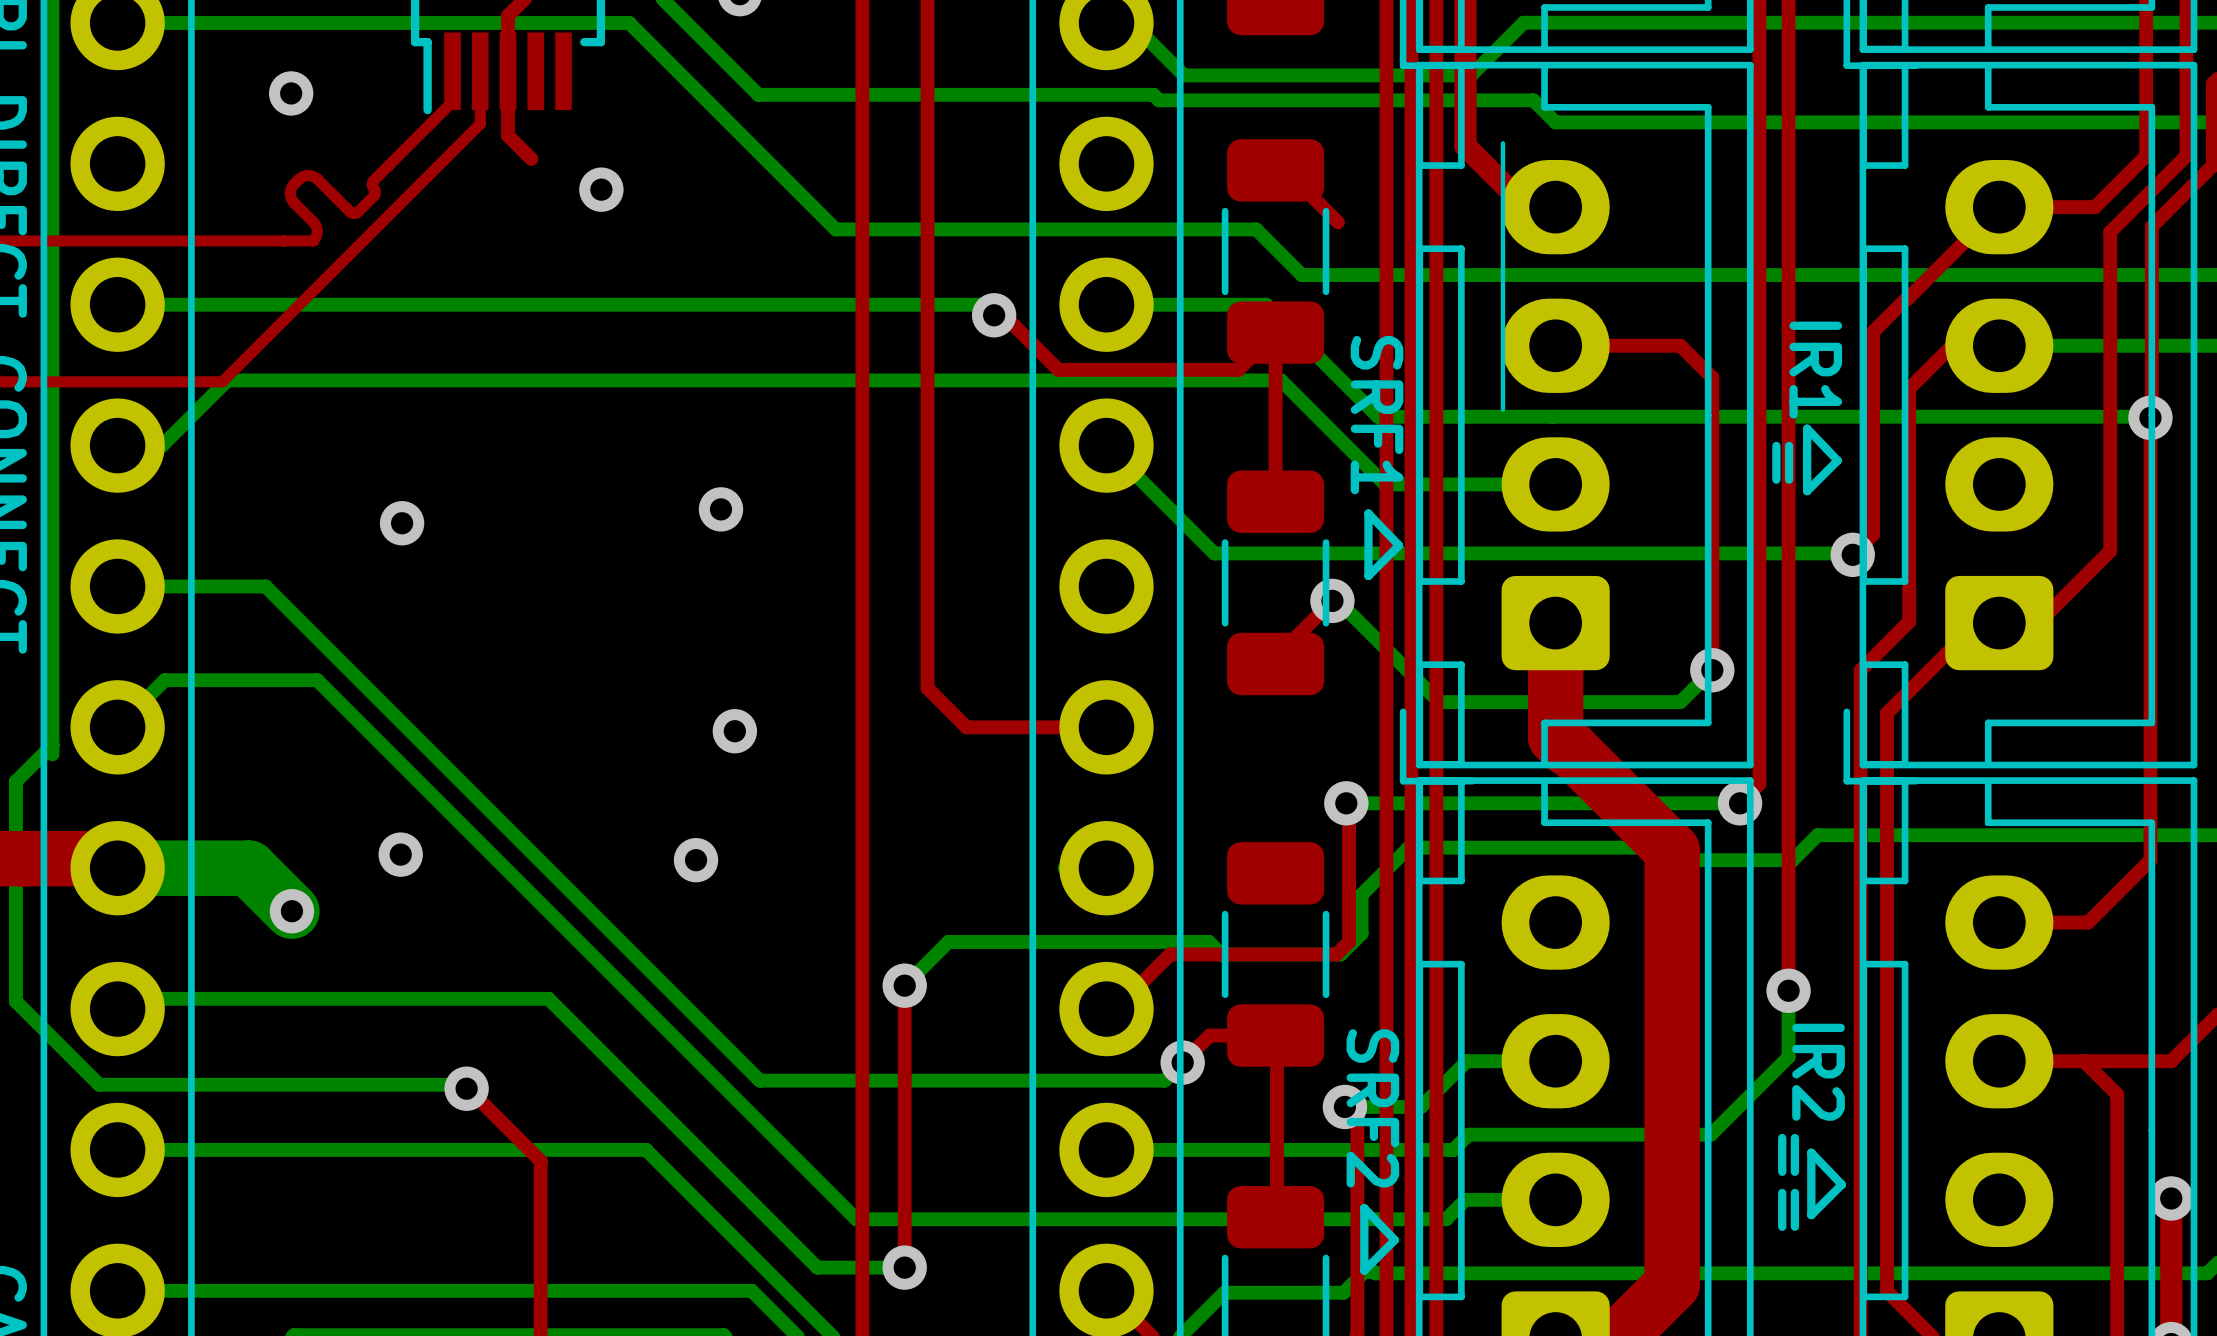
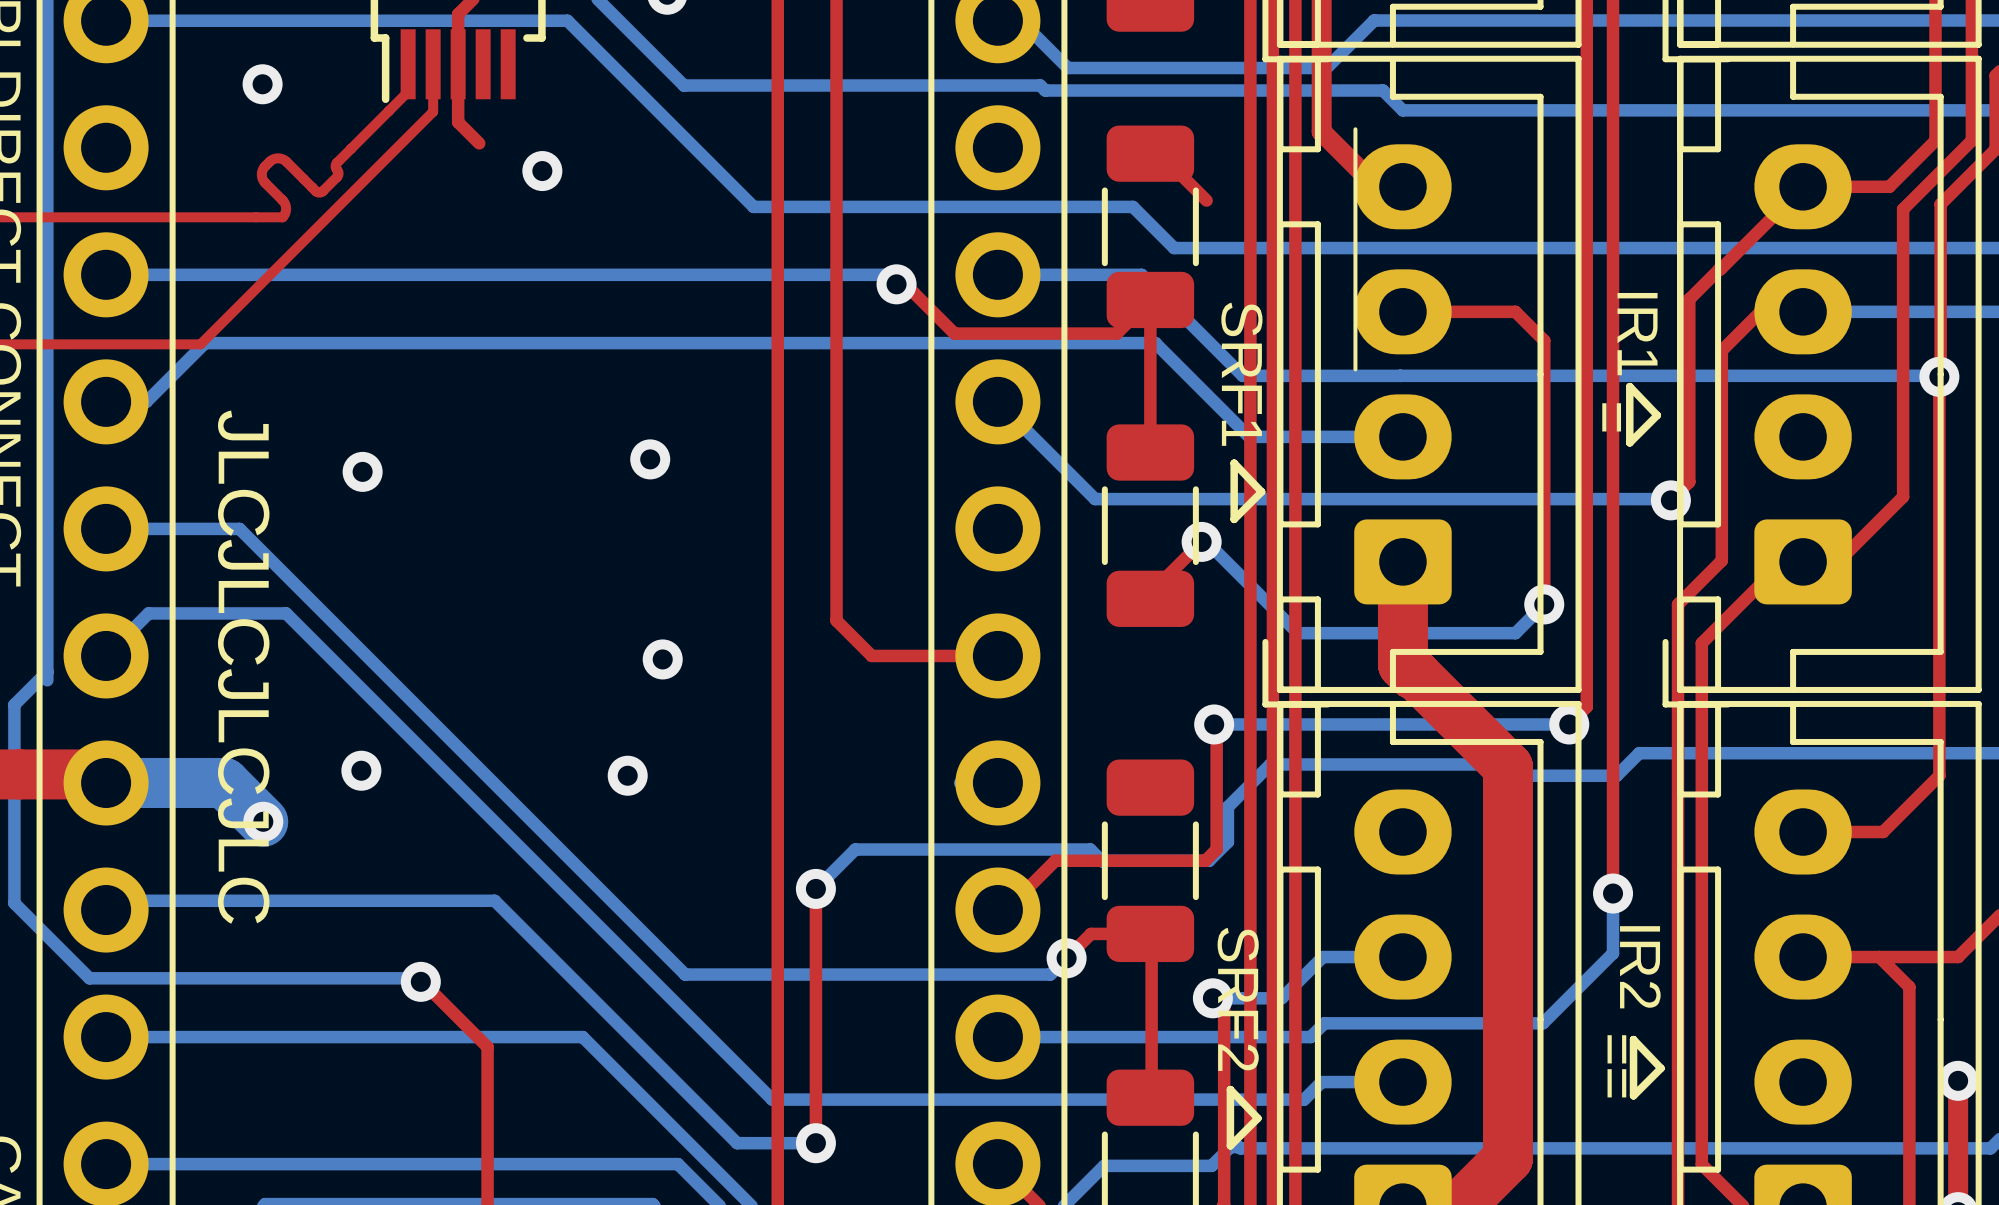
text: none -> JLCJLCJLCJLC (243, 667)

